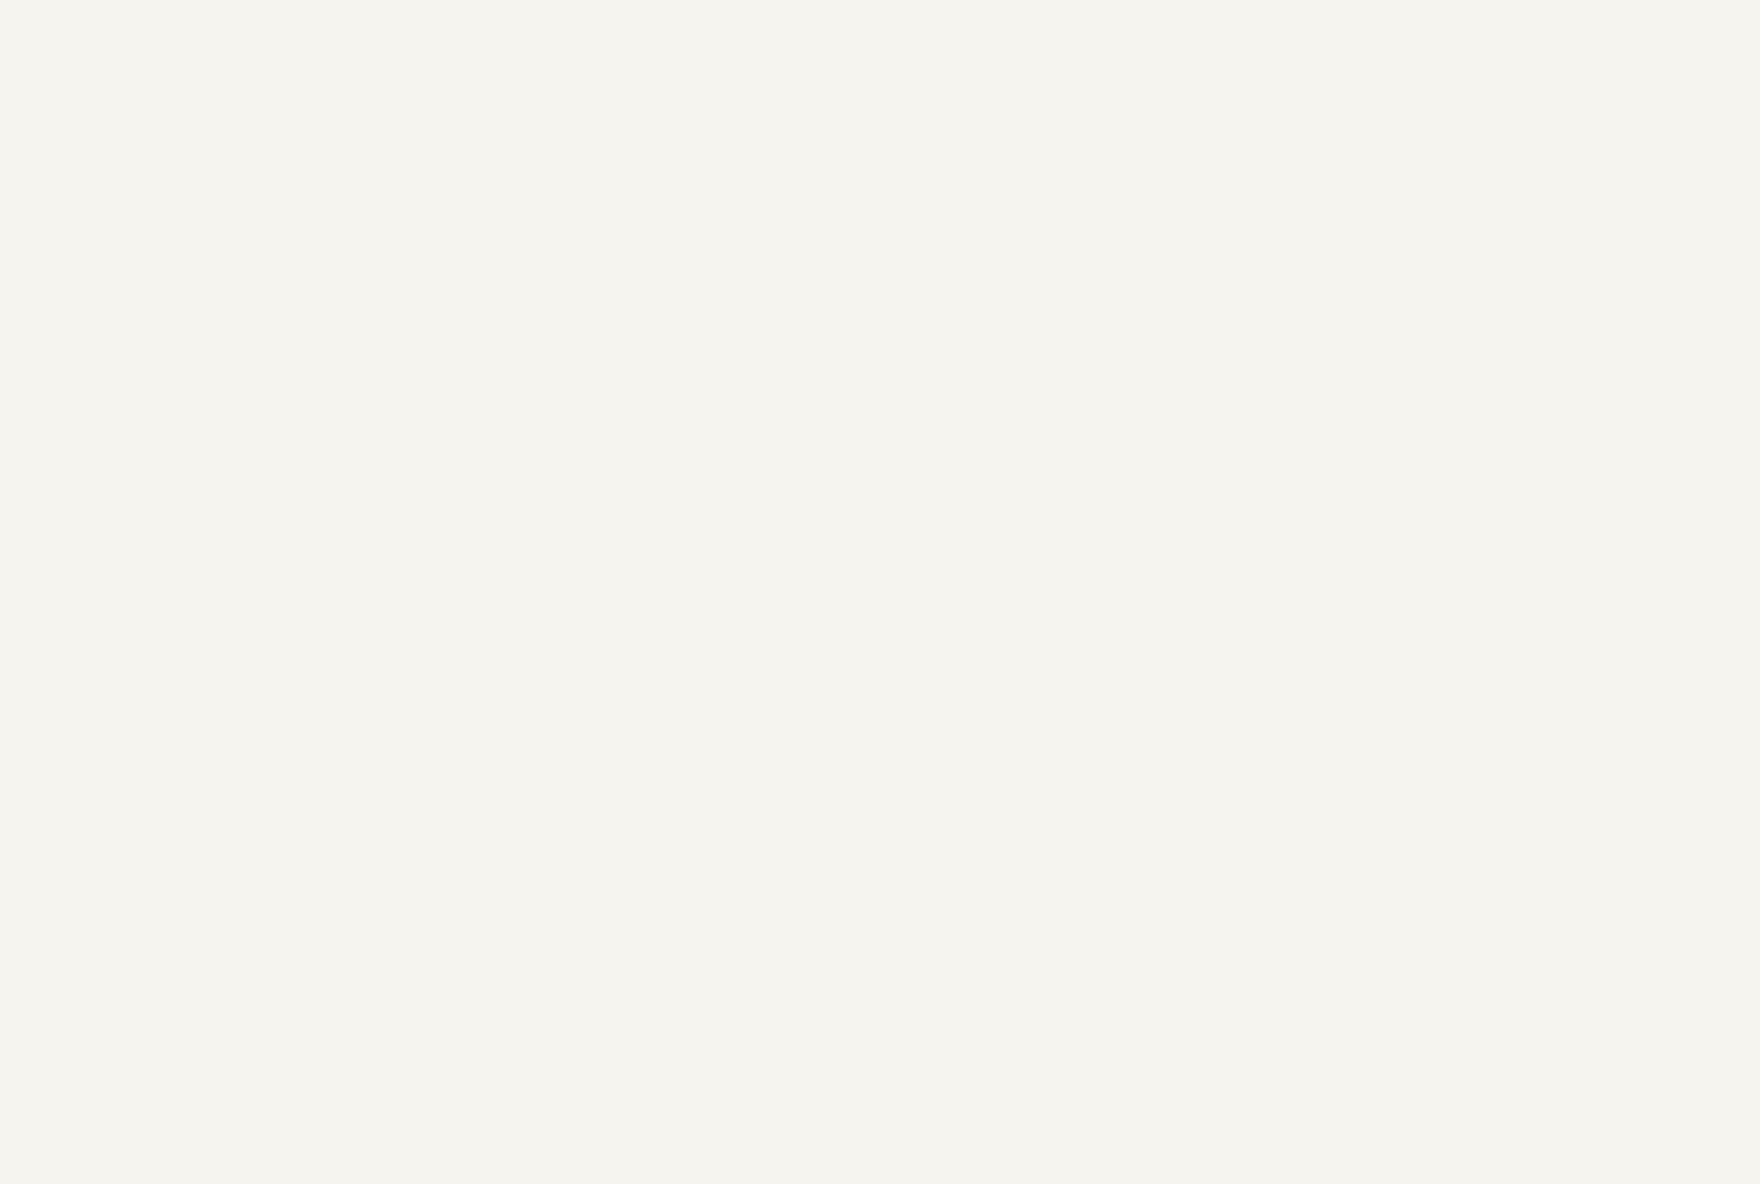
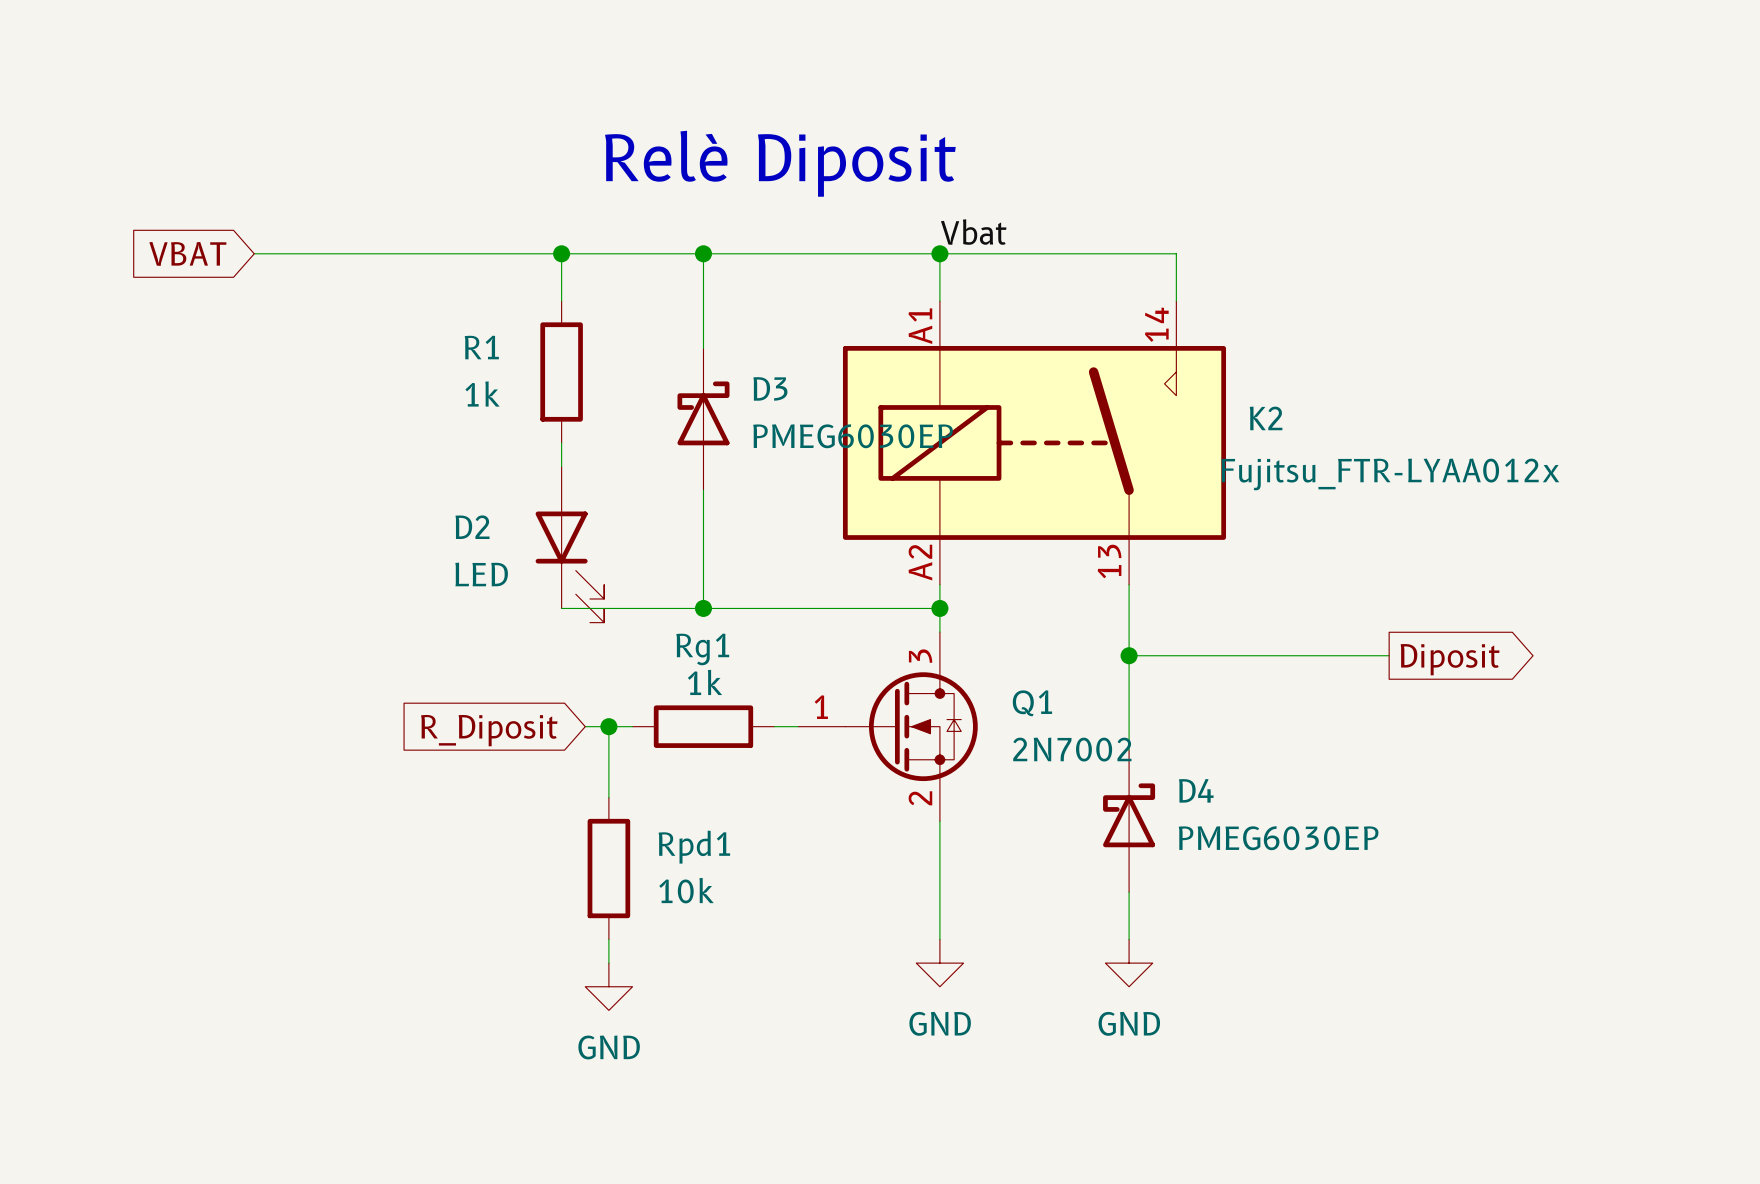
text: none -> Relè Diposit (780, 163)
label: none -> Vbat (973, 232)
global label: none -> VBAT (187, 253)
wire: none -> (254, 253) (1176, 253) (1176, 301)
wire: none -> (561, 253) (561, 301)
junction: none -> (561, 253)
wire: none -> (703, 253) (703, 348)
junction: none -> (703, 253)
wire: none -> (939, 253) (939, 301)
junction: none -> (939, 253)
R1: none -> 1k (561, 372)
D3: none -> PMEG6030EP (703, 419)
wire: none -> (561, 442) (561, 466)
K2: none -> Fujitsu_FTR-LYAA012x (1034, 442)
wire: none -> (703, 490) (703, 608)
D2: none -> LED (569, 544)
wire: none -> (939, 584) (939, 632)
wire: none -> (1129, 584) (1129, 750)
wire: none -> (561, 608) (939, 608)
junction: none -> (703, 608)
junction: none -> (939, 608)
wire: none -> (1129, 655) (1389, 655)
junction: none -> (1129, 655)
global label: none -> Diposit (1450, 659)
wire: none -> (585, 726) (632, 726)
wire: none -> (608, 726) (608, 797)
junction: none -> (608, 726)
Rg1: none -> 1k (703, 726)
wire: none -> (774, 726) (798, 726)
Q1: none -> 2N7002 (887, 726)
global label: none -> R_Diposit (489, 730)
wire: none -> (939, 821) (939, 939)
D4: none -> PMEG6030EP (1129, 821)
Rpd1: none -> 10k (608, 868)
wire: none -> (1129, 892) (1129, 939)
wire: none -> (608, 939) (608, 963)
power symbol: none -> GND (939, 963)
power symbol: none -> GND (1129, 963)
power symbol: none -> GND (608, 986)

